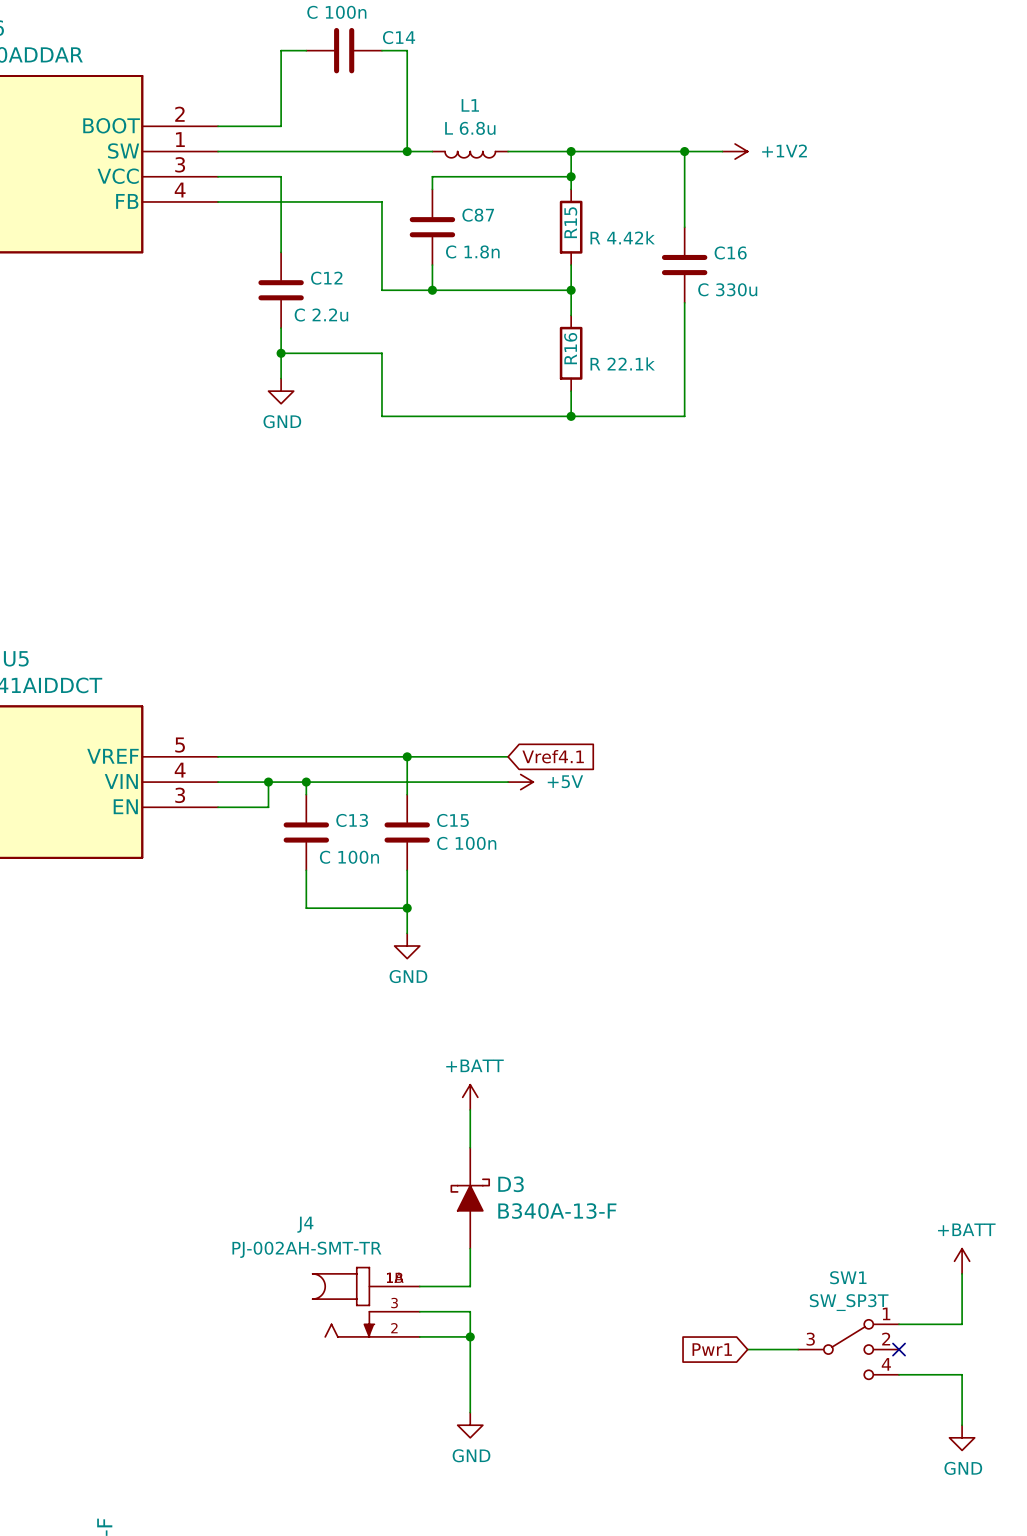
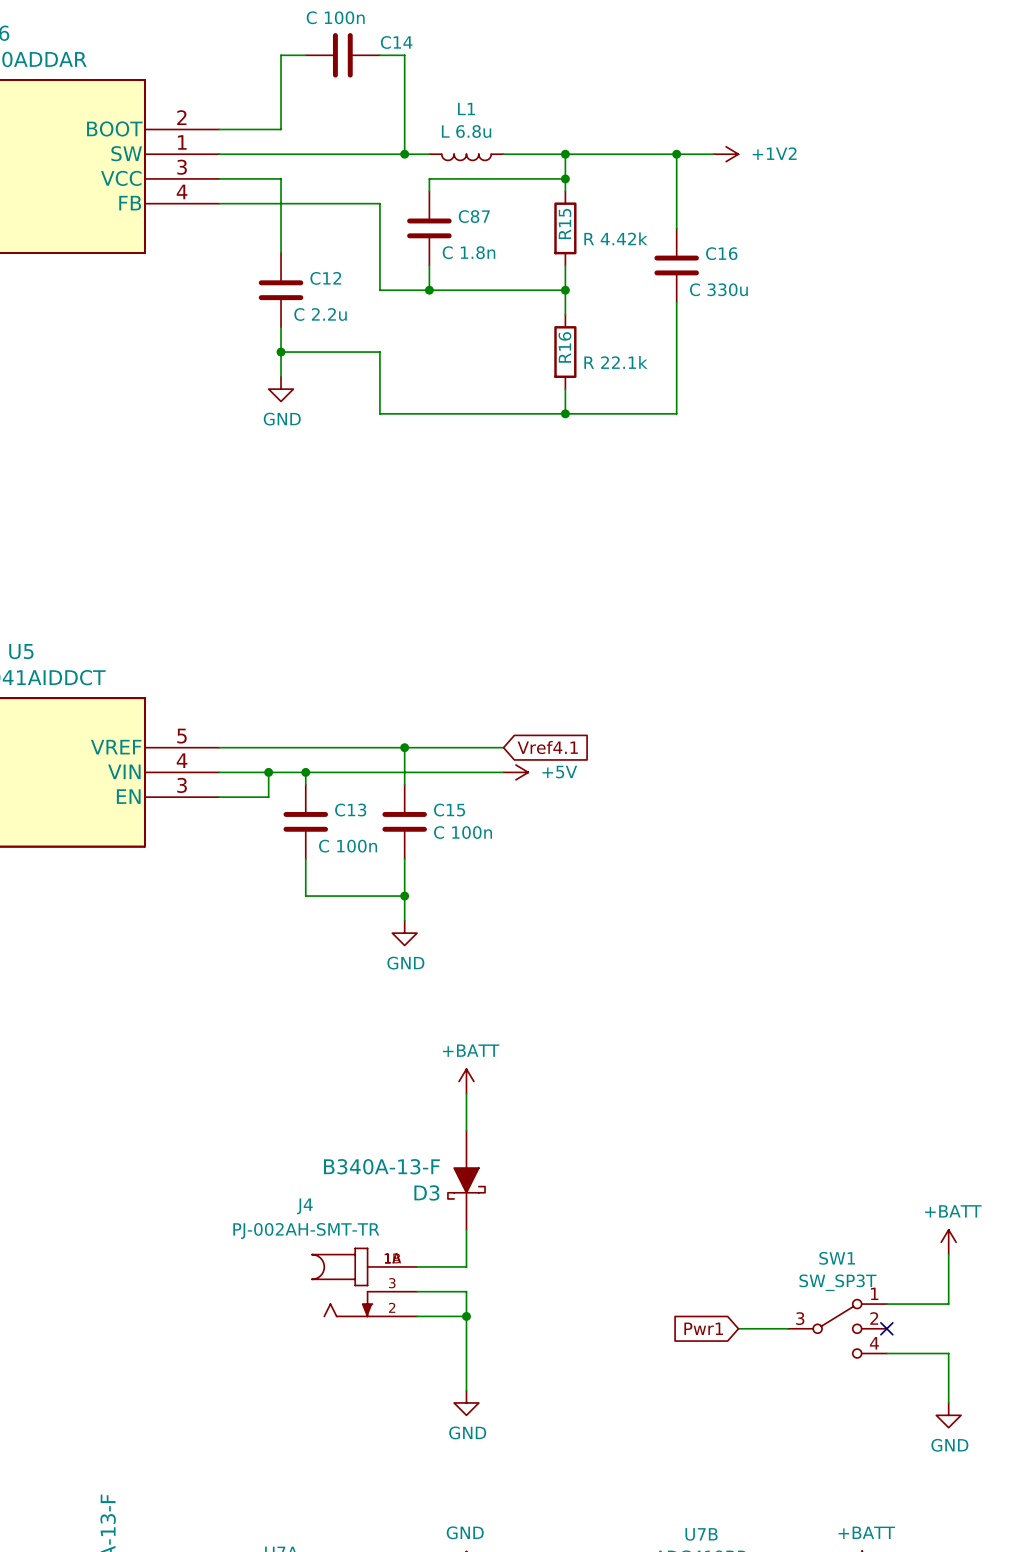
D3 rotation: 0° (470, 1195) -> 180° (466, 1183)

